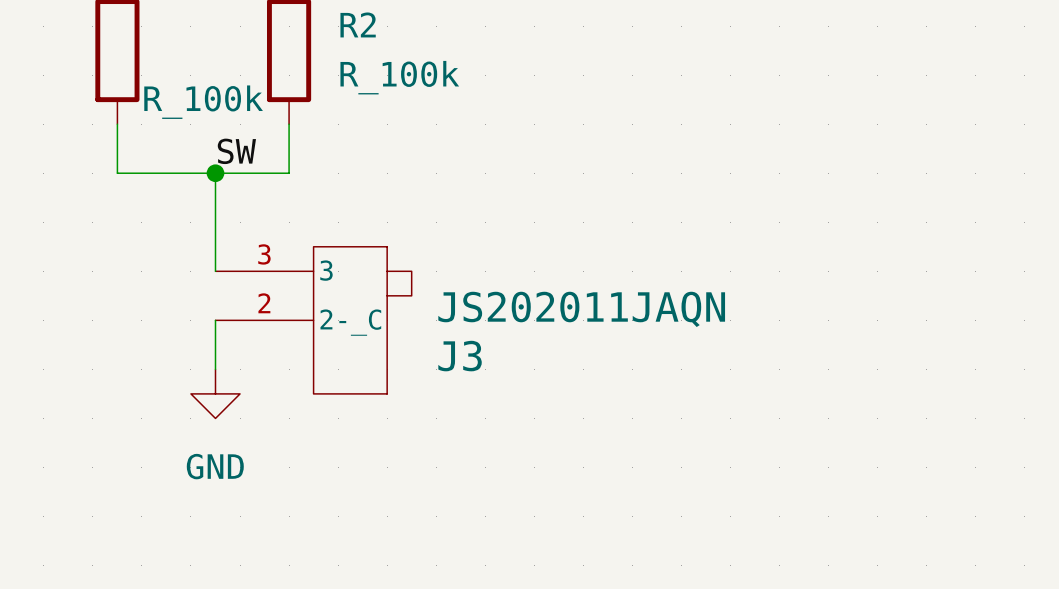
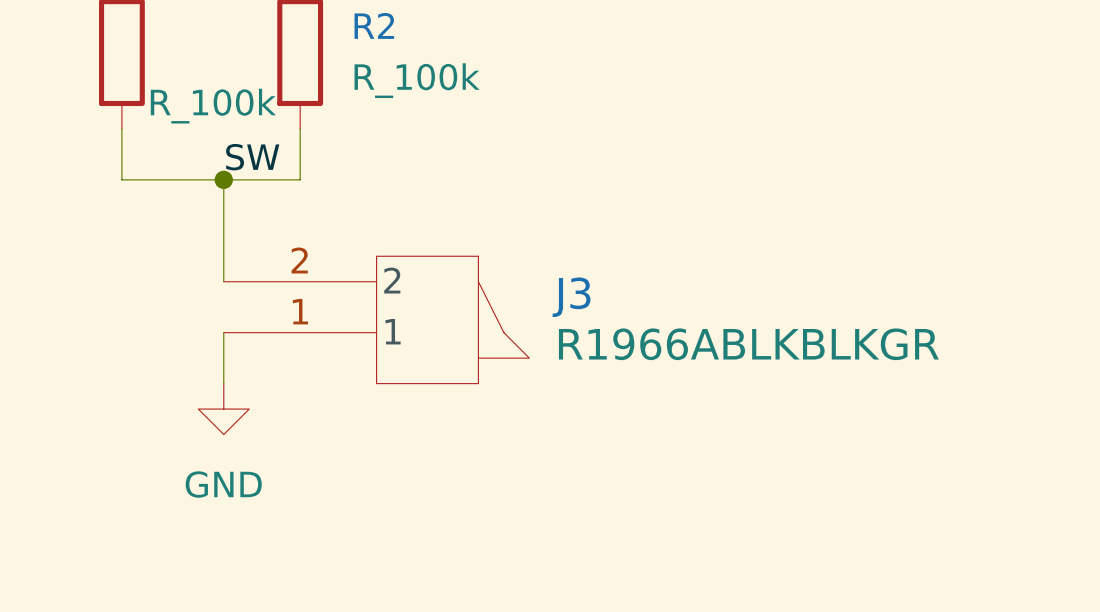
J3 symbol: [215, 246, 412, 394] -> [223, 256, 530, 384]
J3 value: JS202011JAQN (581, 309) -> R1966ABLKBLKGR (748, 344)
J3 name position: J3 (460, 356) -> J3 (571, 297)

